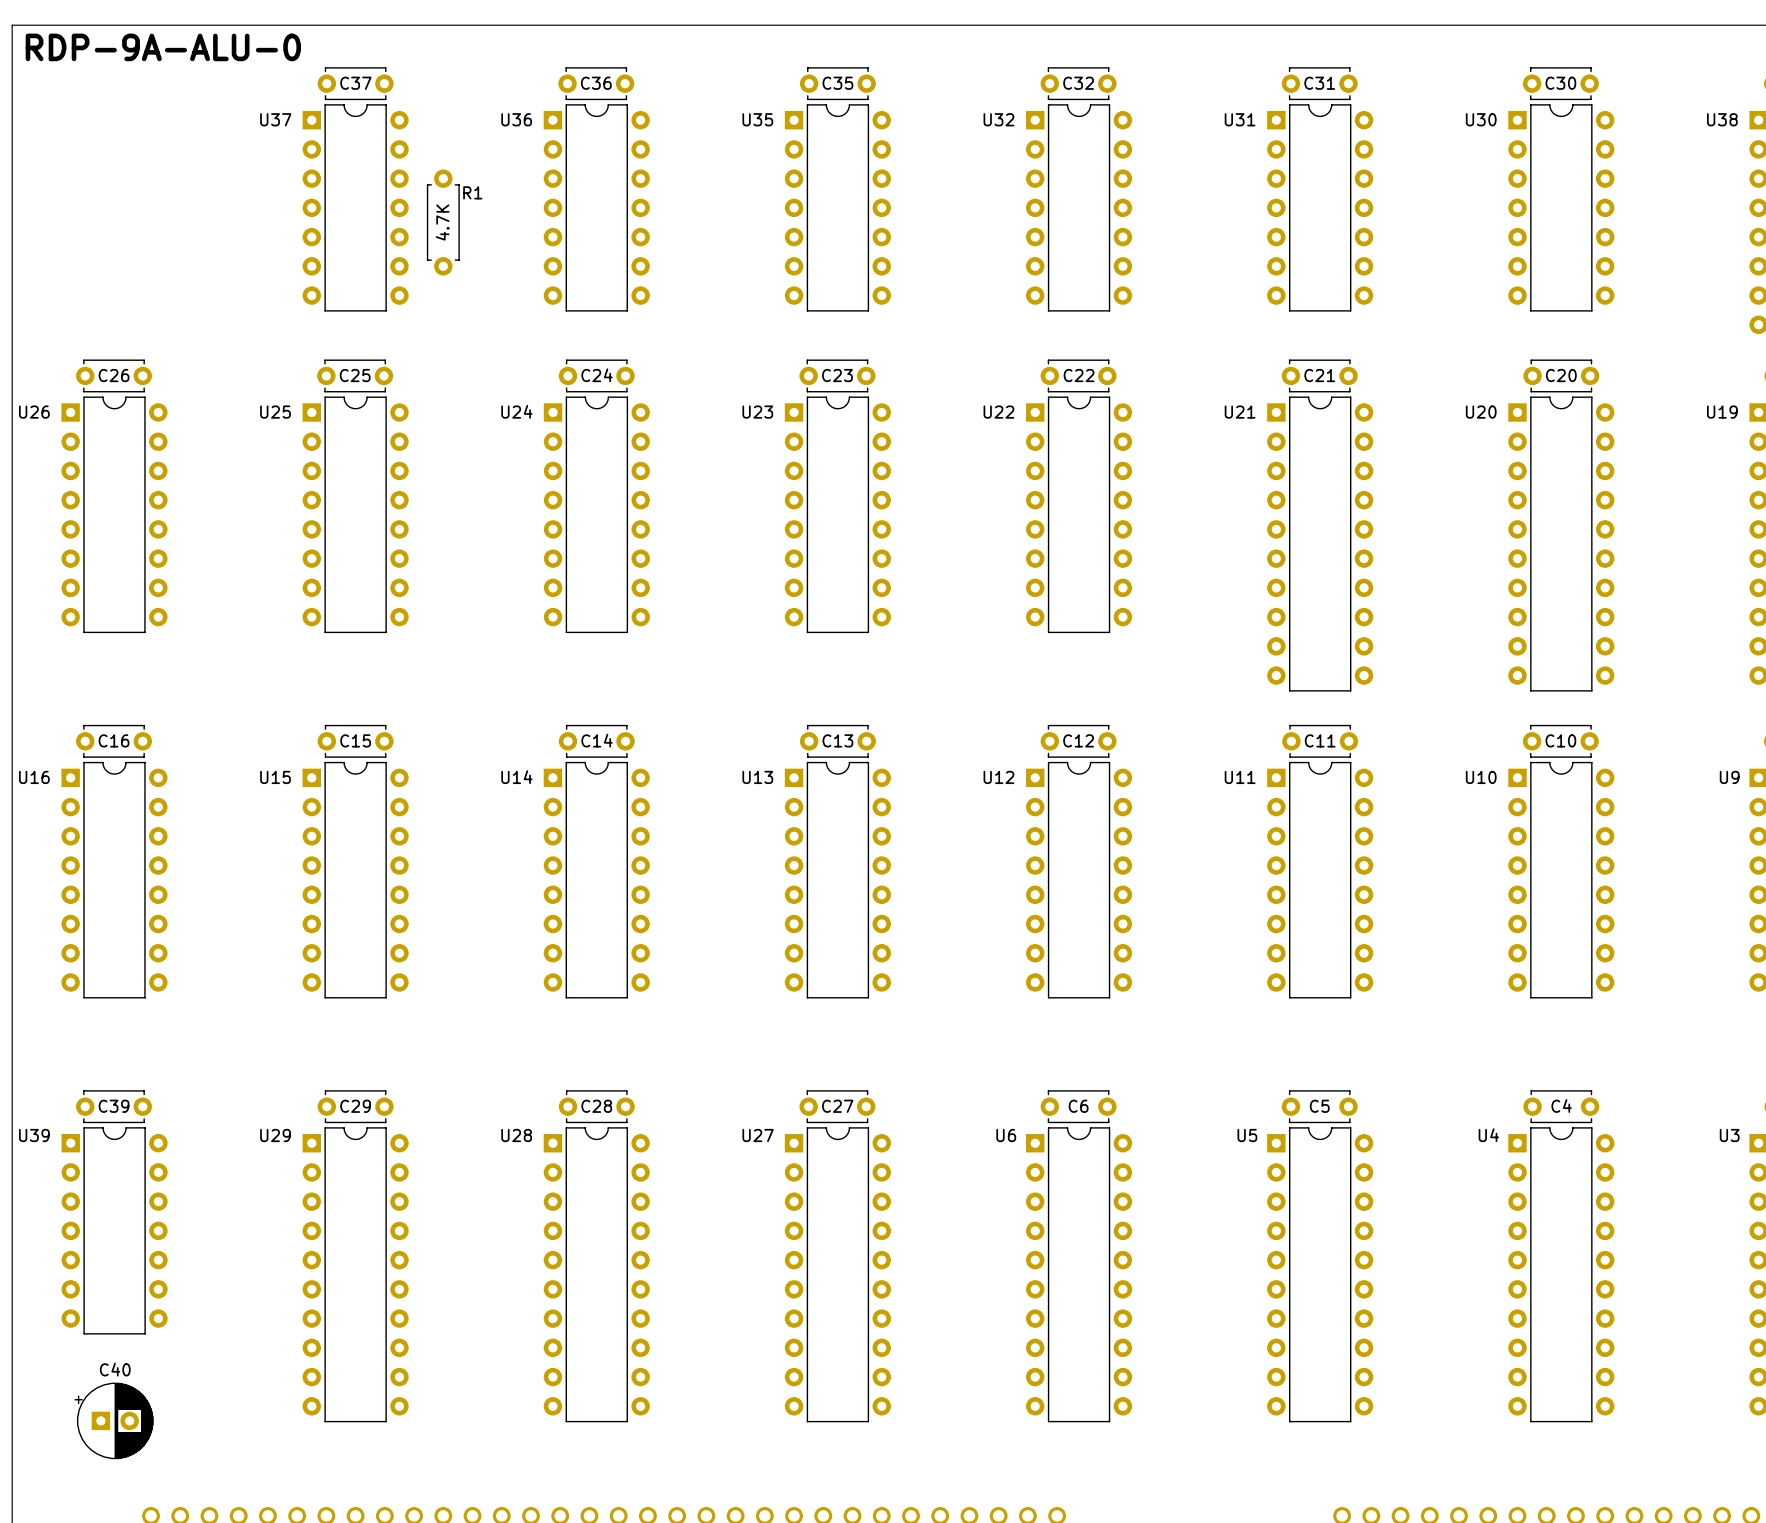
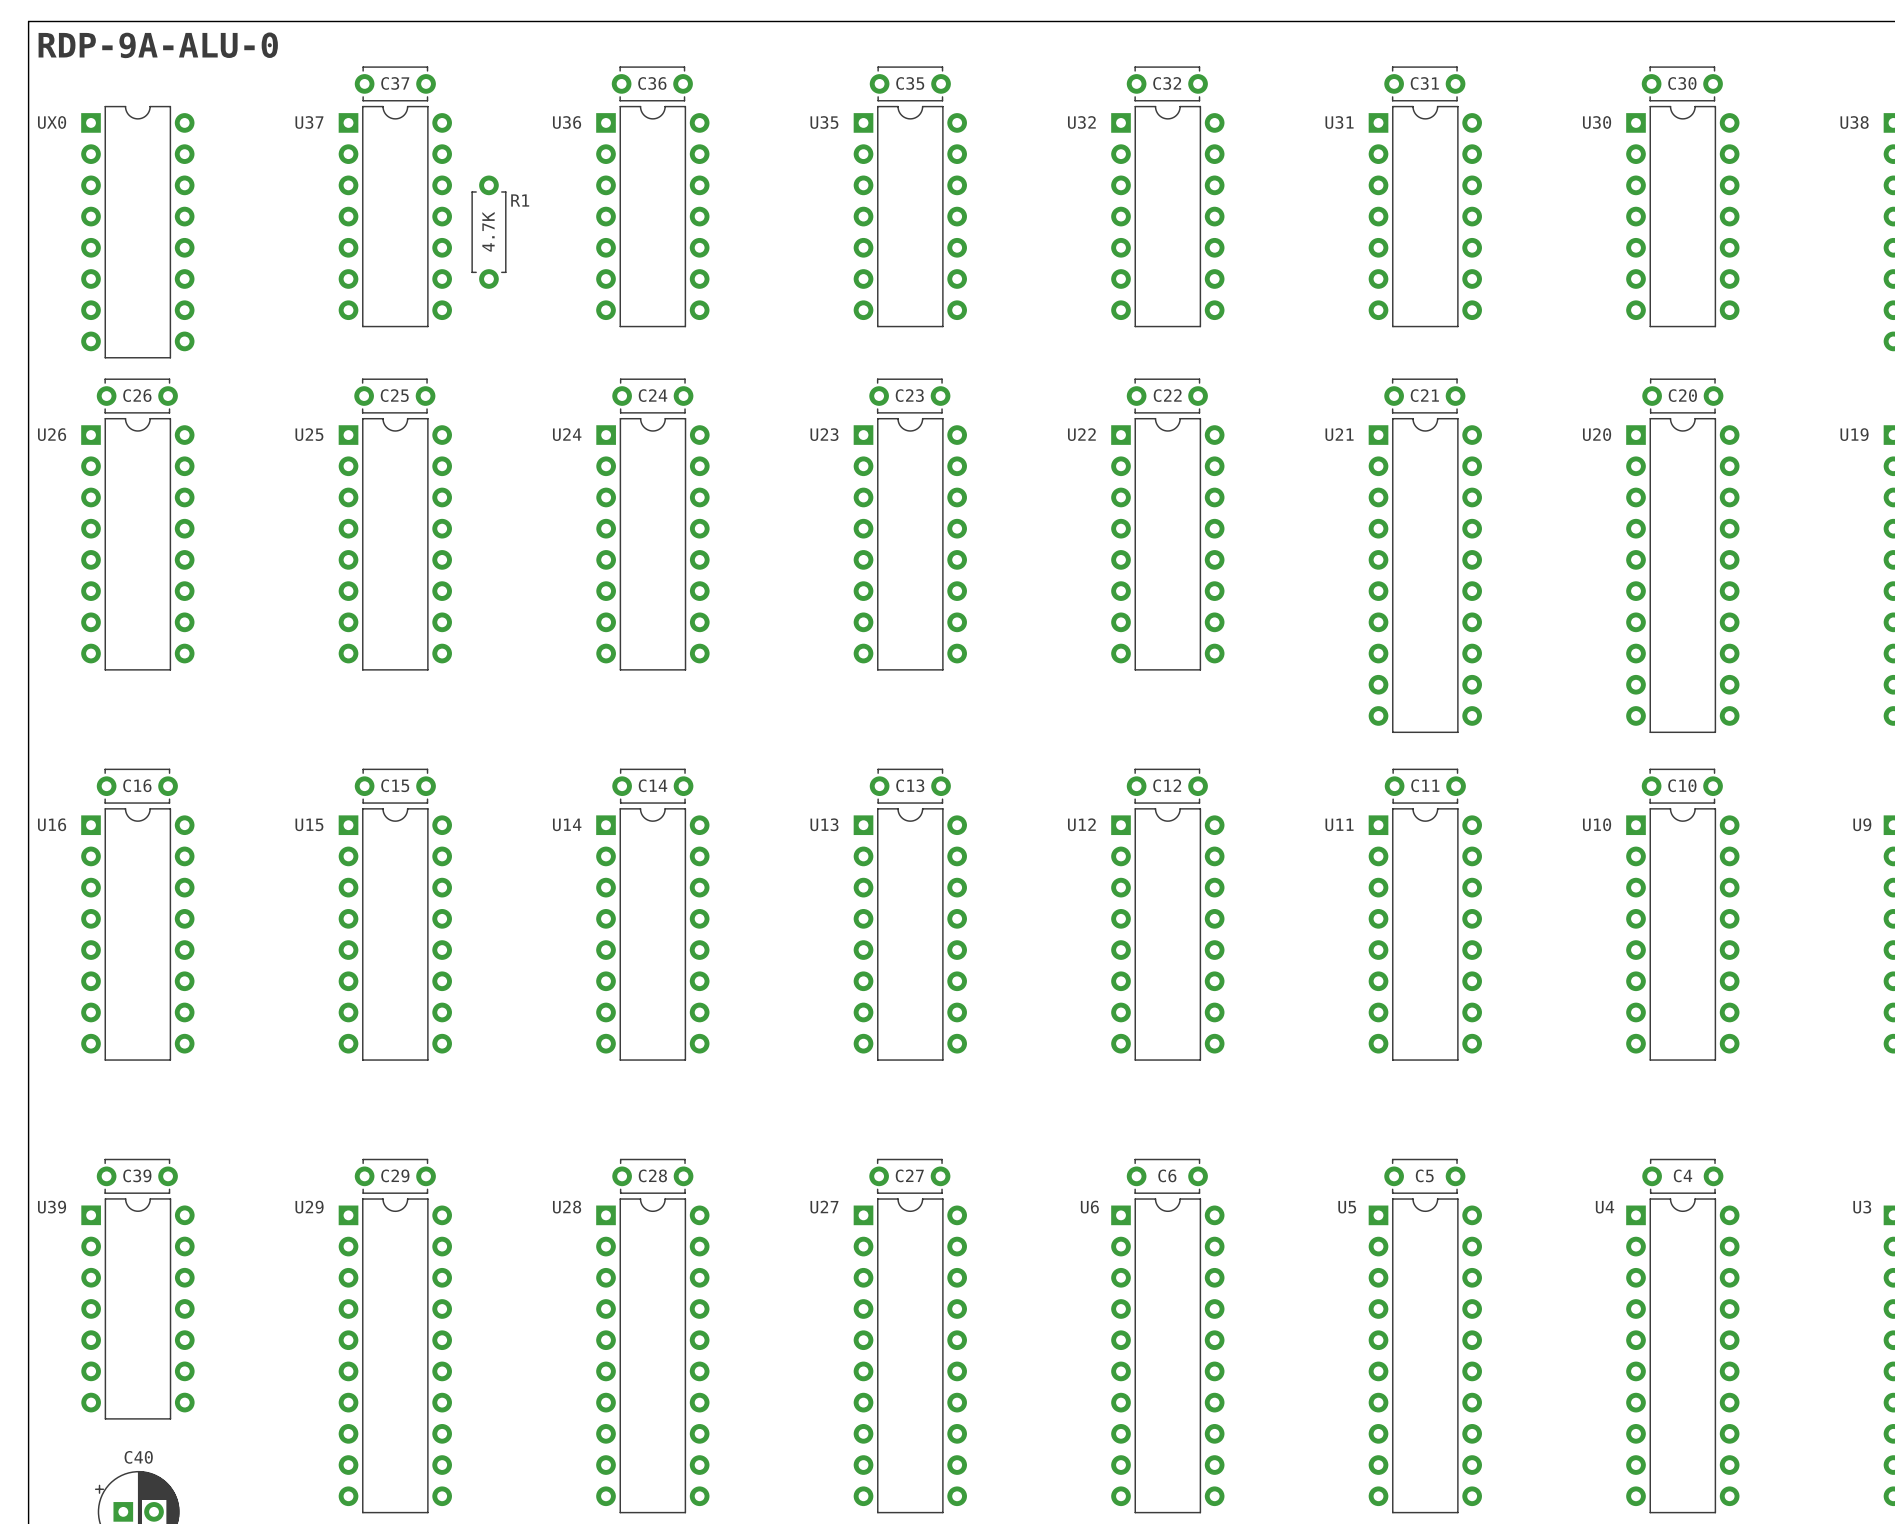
UX0: none -> (137, 232)

